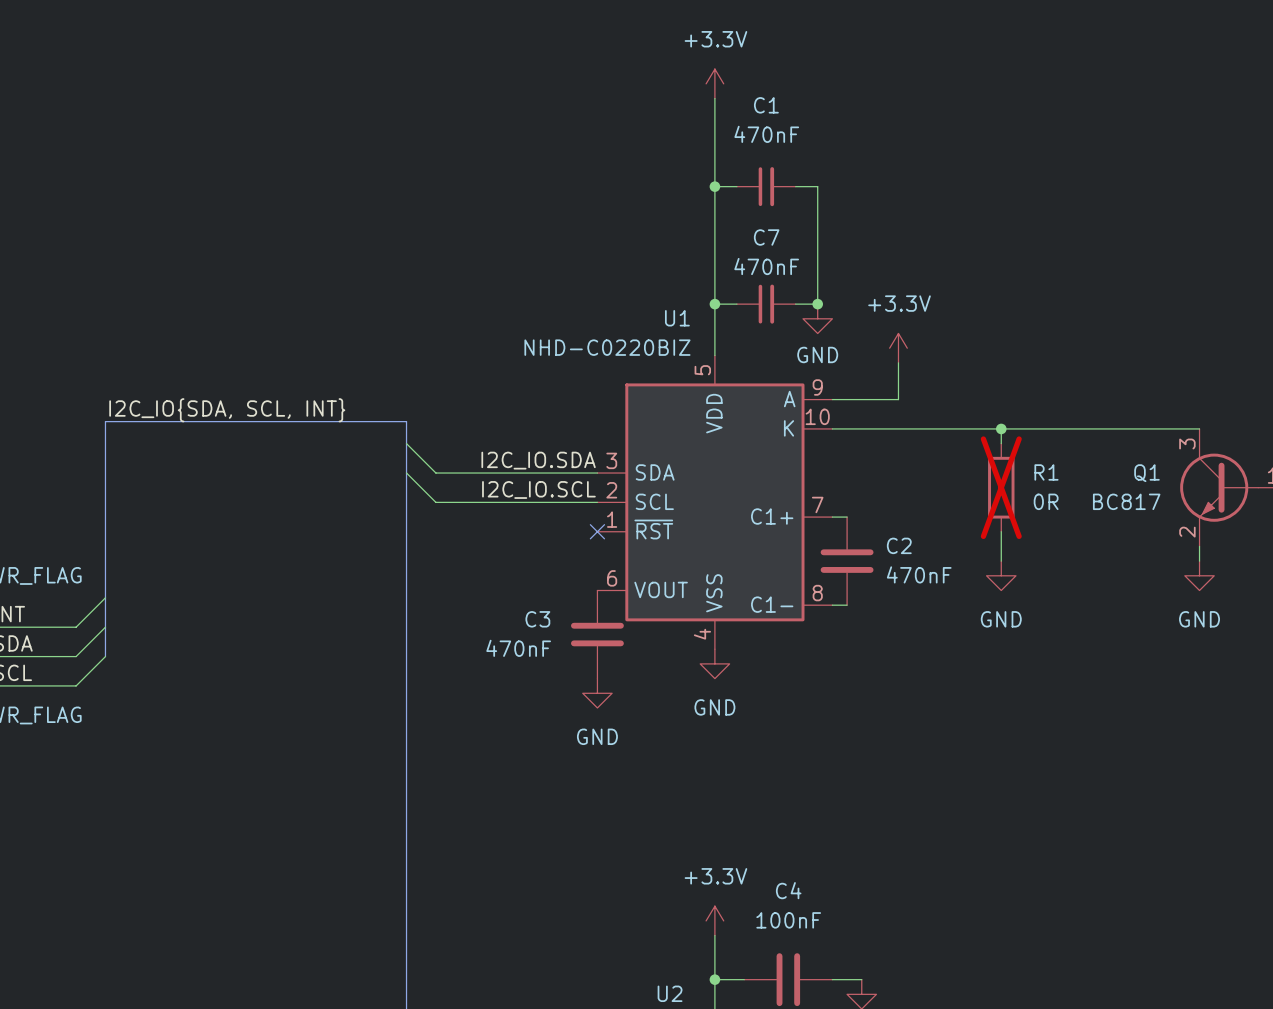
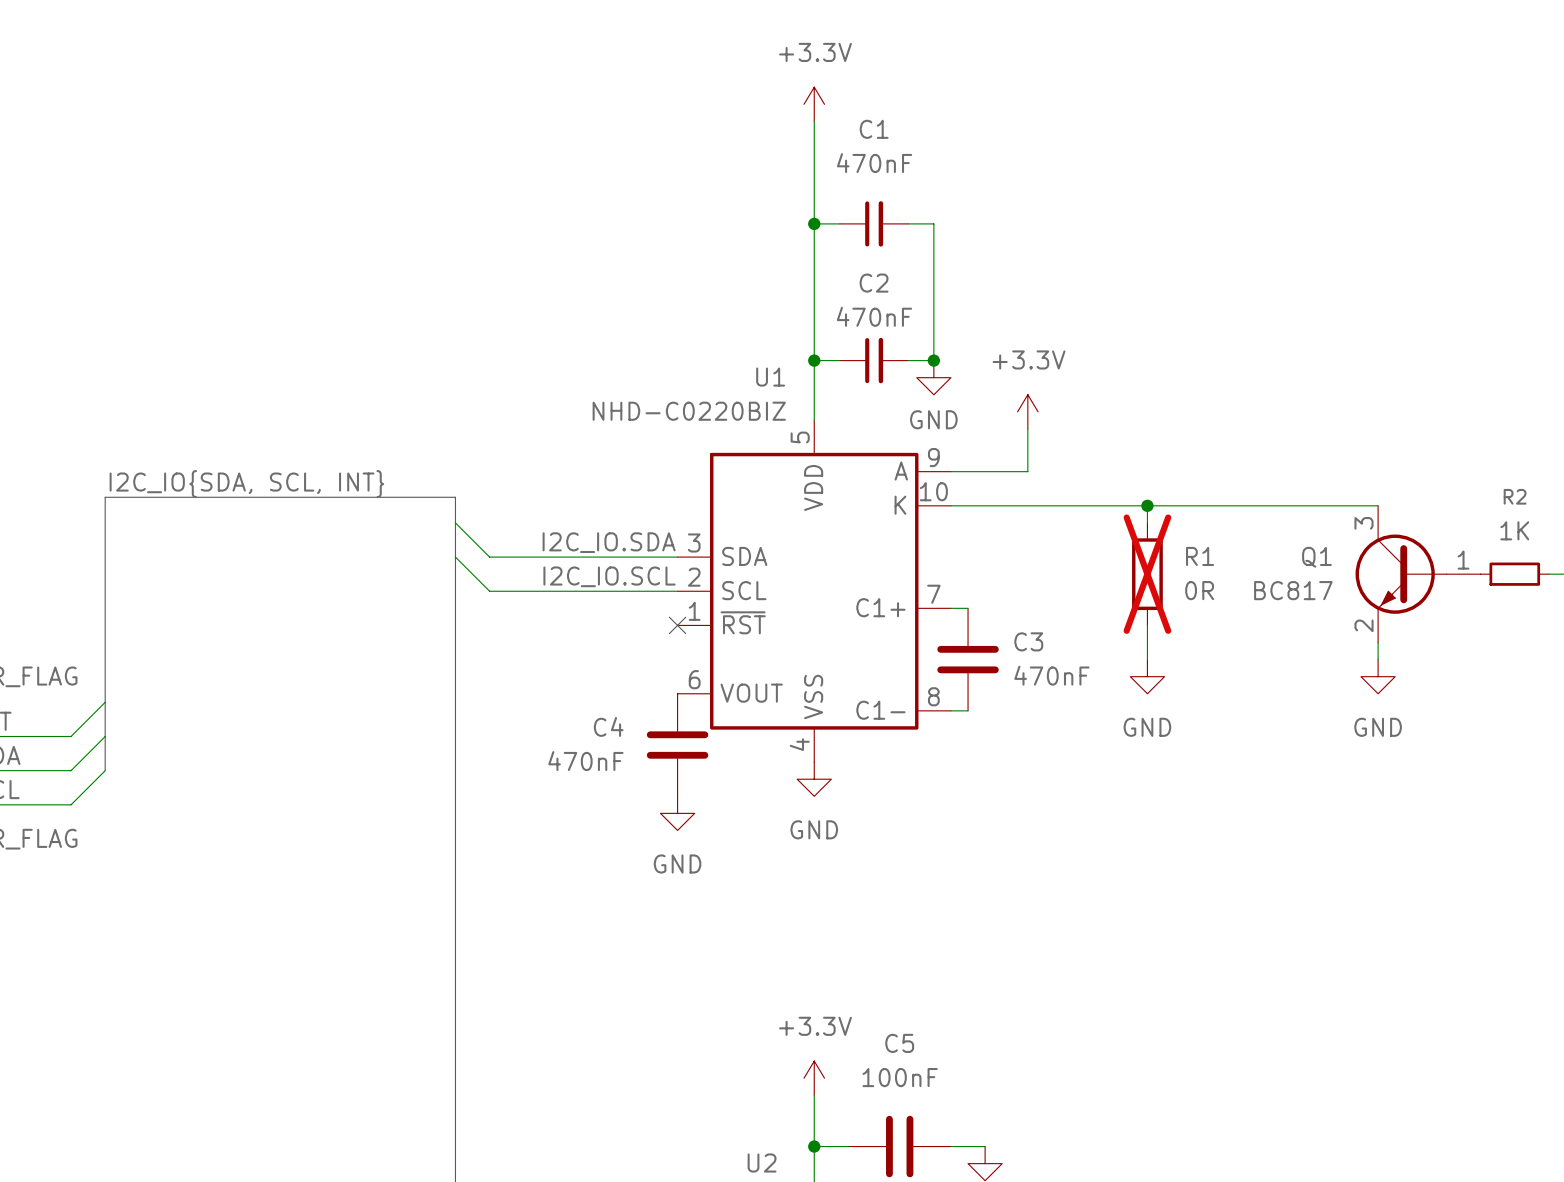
C7 name: C7 (766, 237) -> C2 (874, 283)
C2 name: C2 (899, 545) -> C3 (1028, 641)
C3 name: C3 (537, 619) -> C4 (608, 726)
C4 name: C4 (788, 890) -> C5 (899, 1043)

